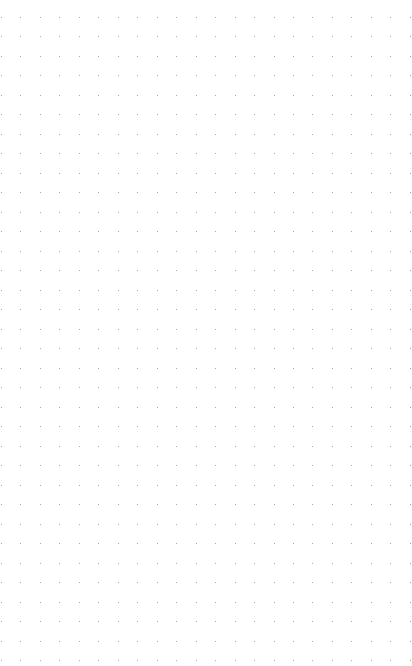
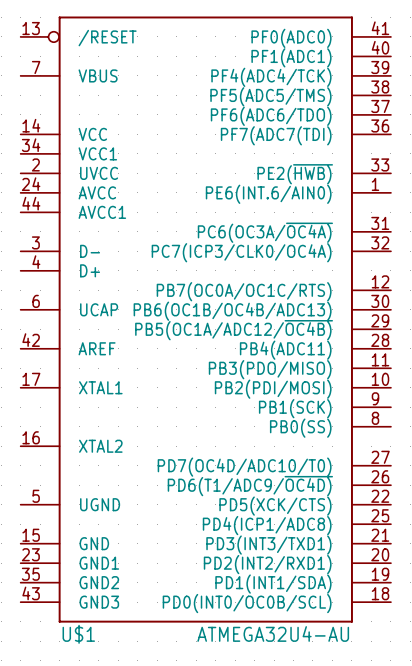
U$1: none -> ATMEGA32U4-AU (205, 319)

